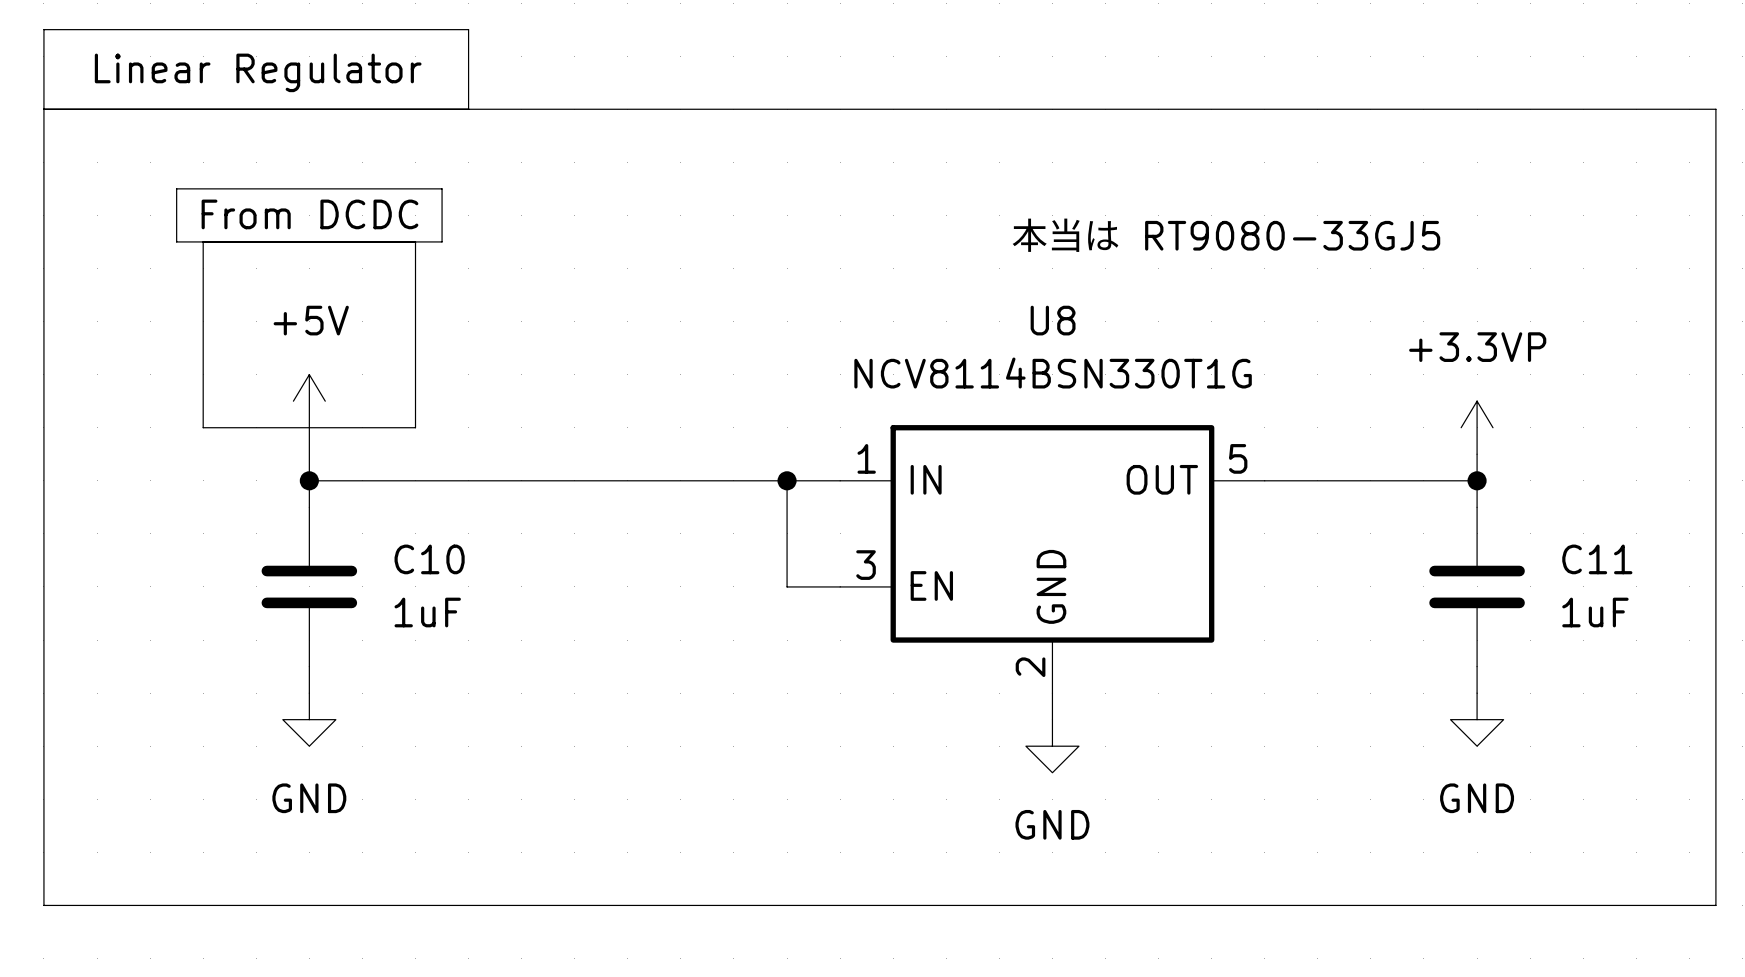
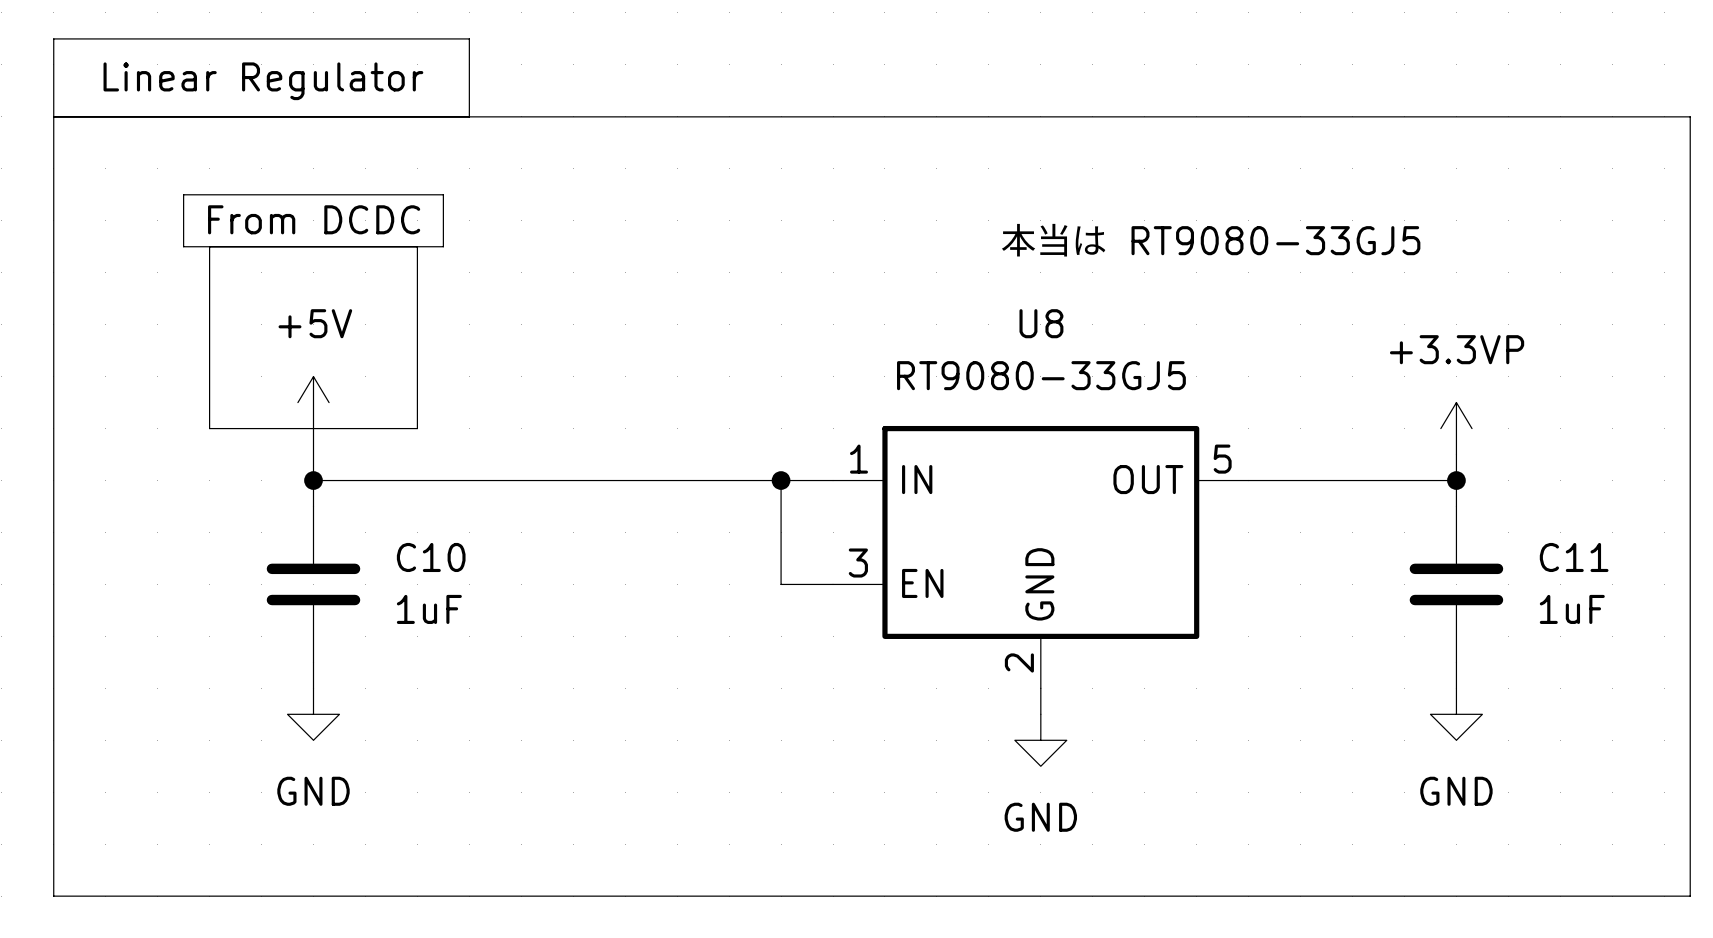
U8 value: NCV8114BSN330T1G (1053, 373) -> RT9080-33GJ5 (1041, 375)

